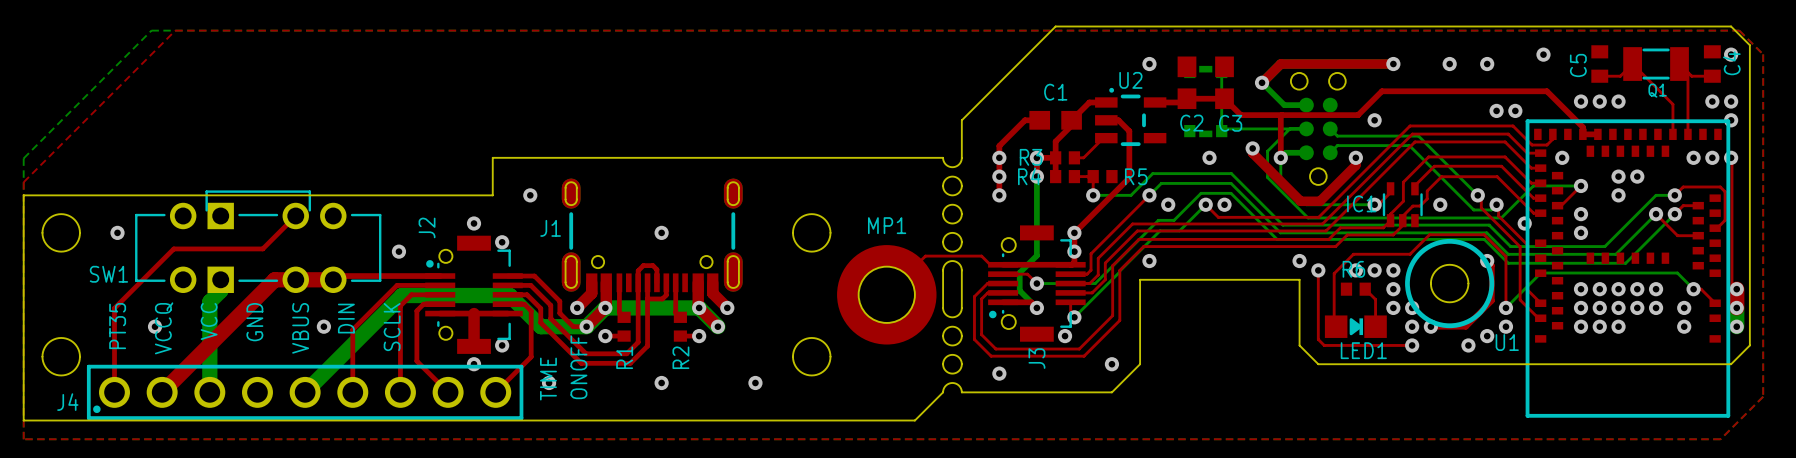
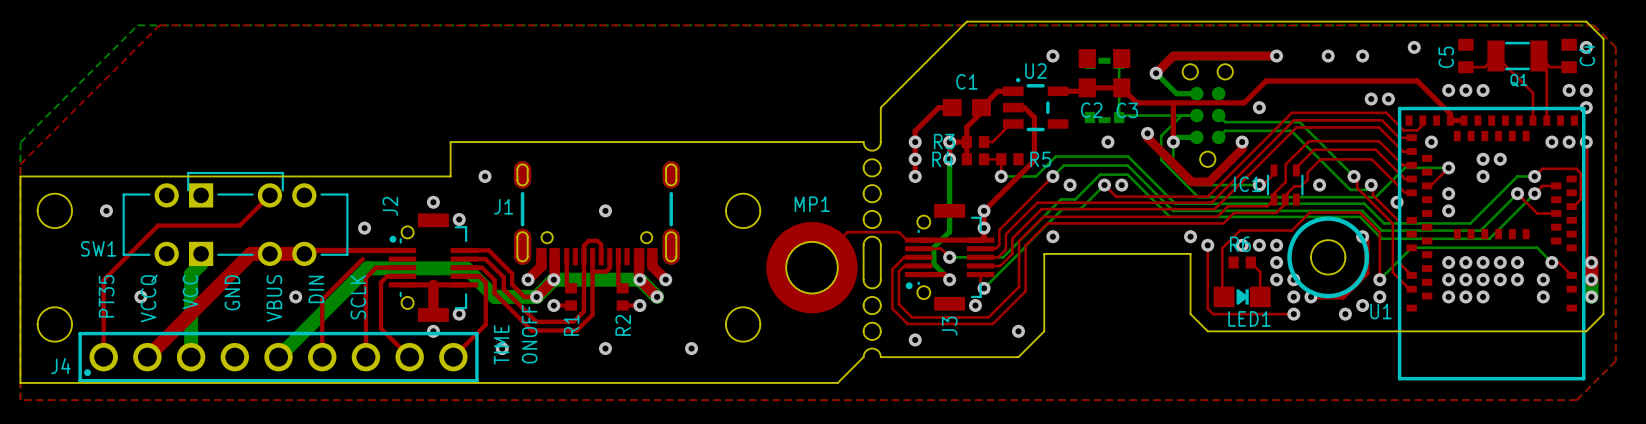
top track: (397, 285) (440, 285) -> none

